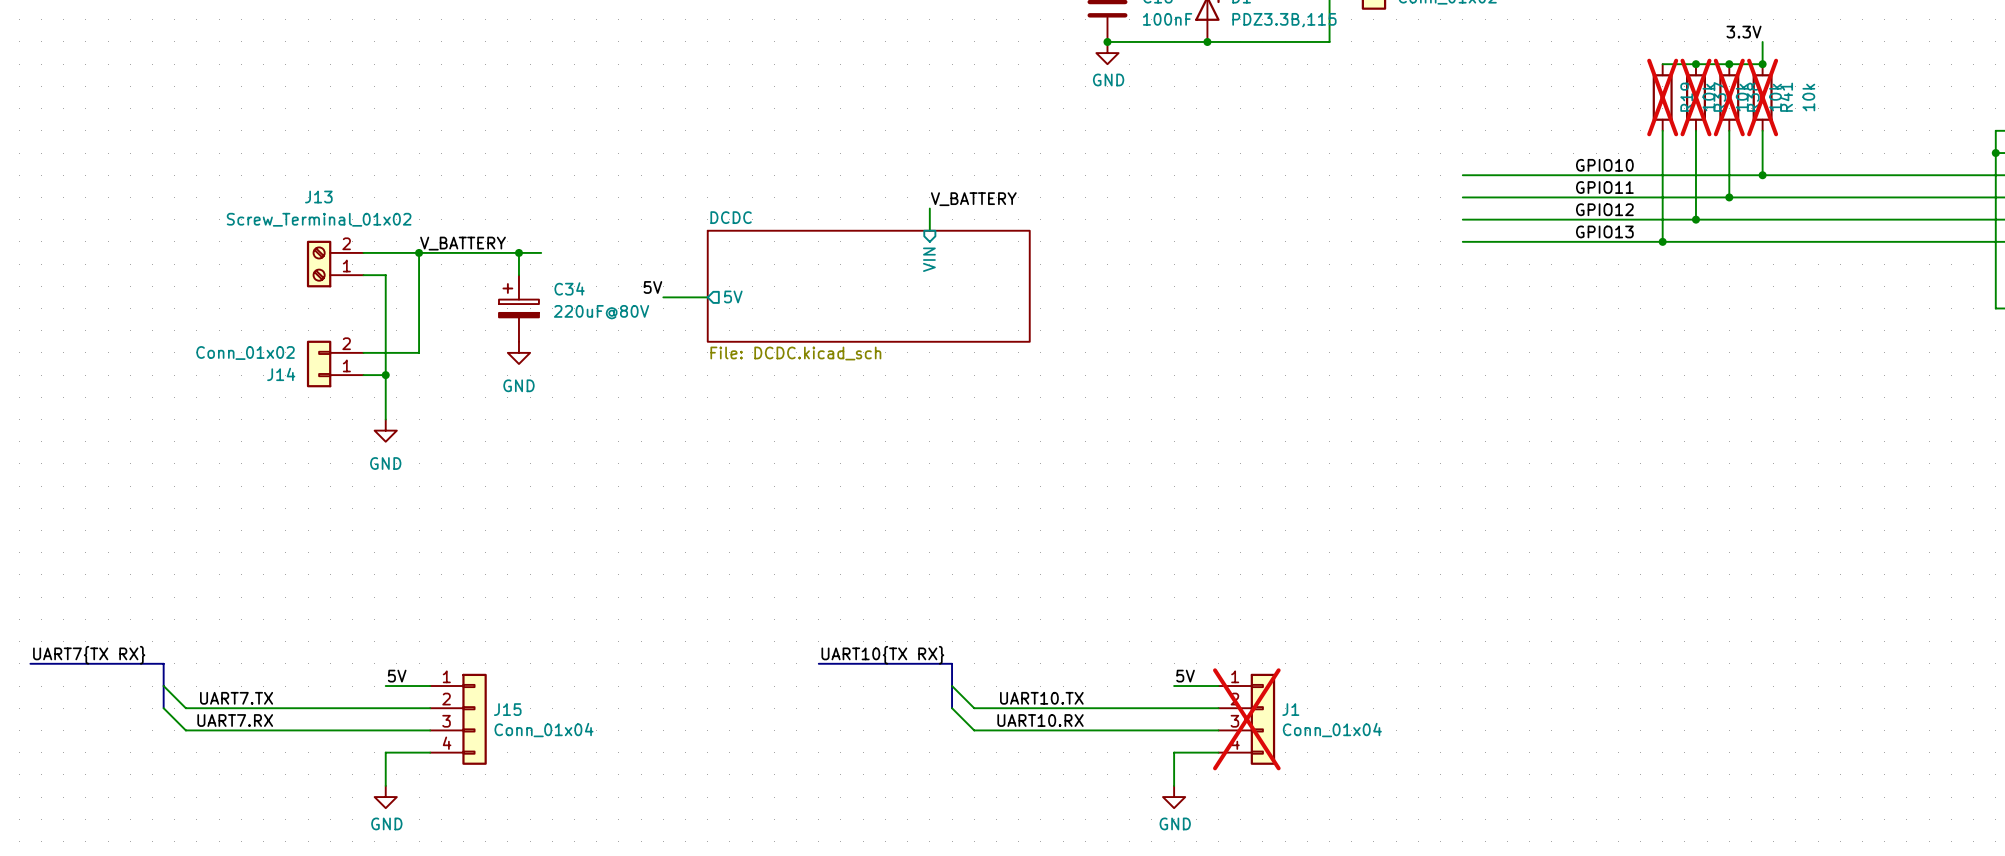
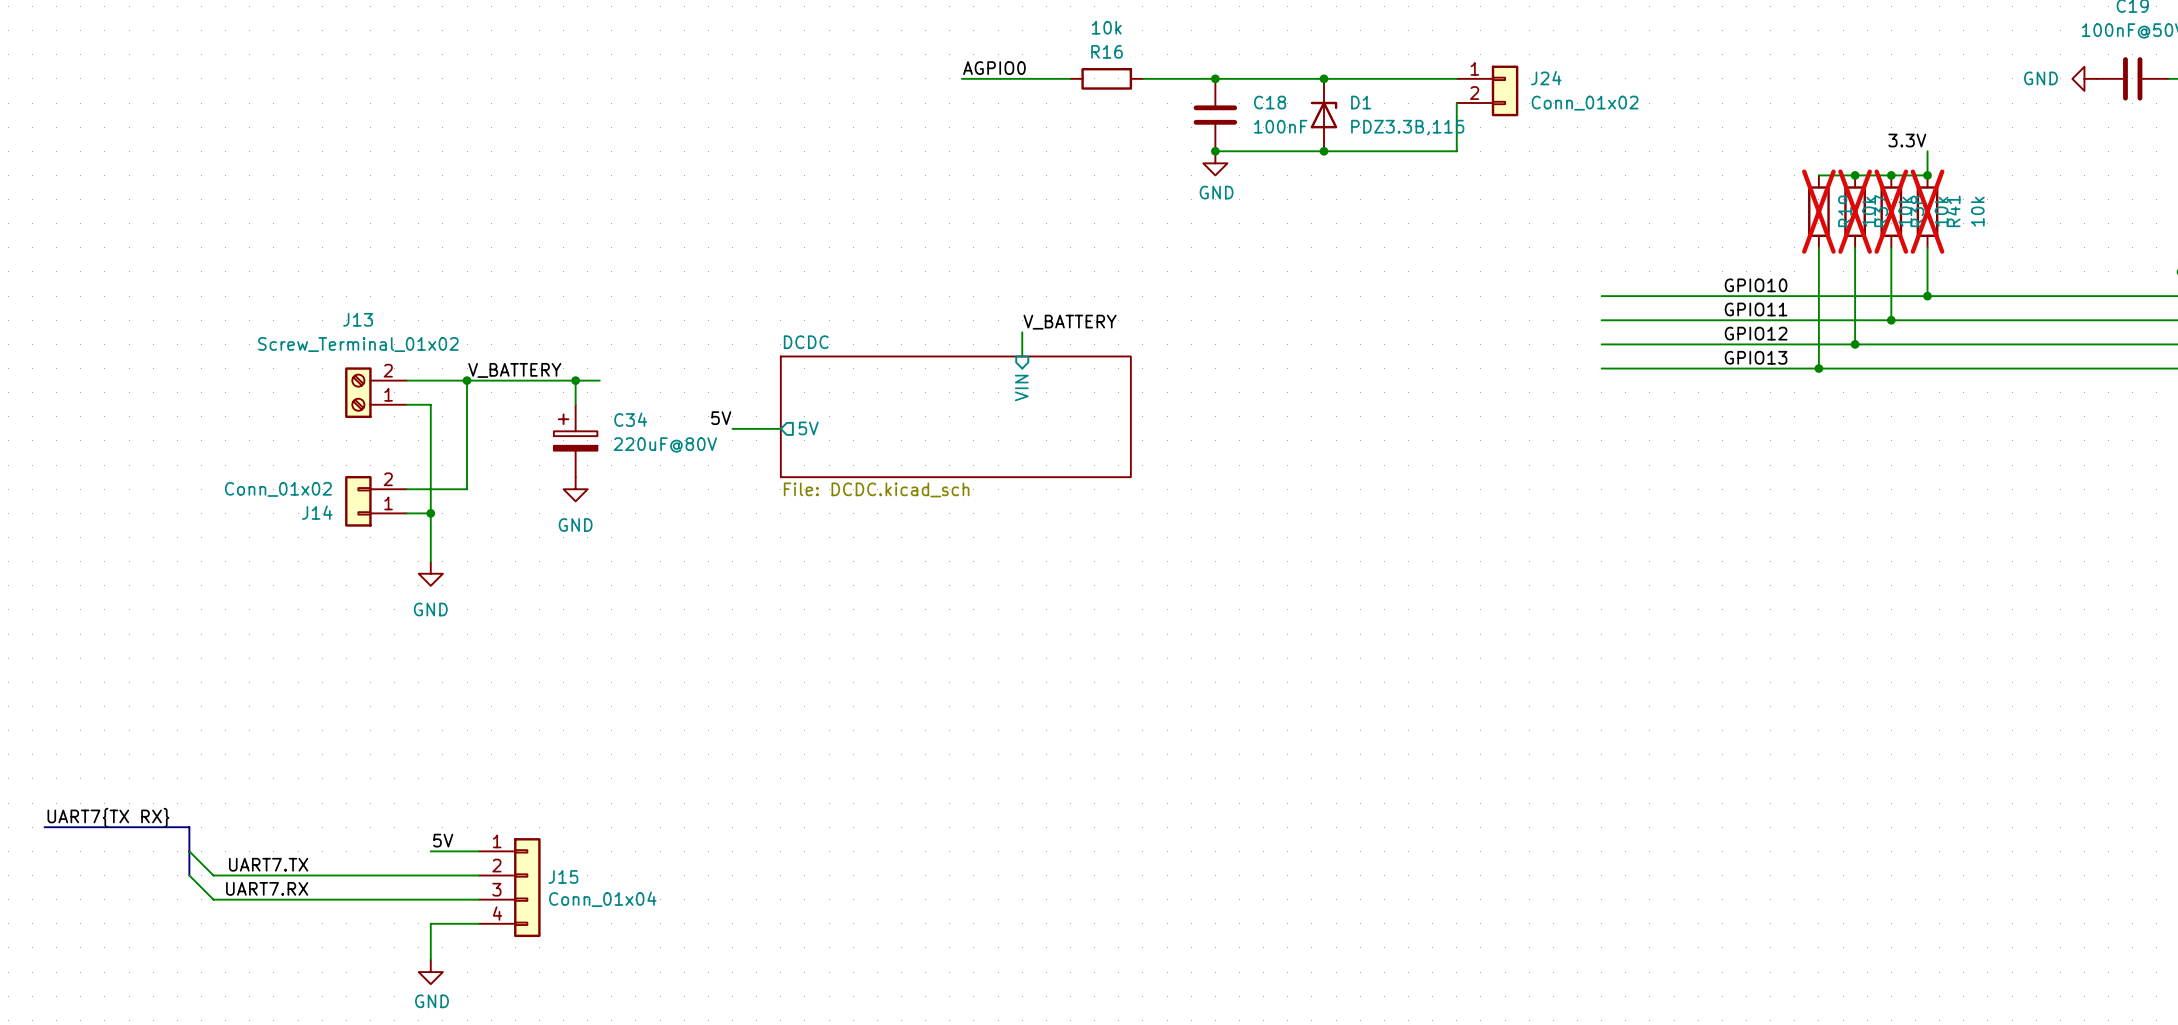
label: UART10{TX RX} (882, 655) -> none
bus: (818, 663) (952, 663) (952, 708) -> none
label: 5V (1185, 676) -> none
wire: (952, 686) (974, 708) (1218, 708) -> none
wire: (1174, 686) (1218, 686) -> none
label: UART10.TX (1041, 698) -> none
wire: (952, 708) (974, 730) (1218, 730) -> none
J1: Conn_01x04 (1246, 719) -> none
label: UART10.RX (1040, 720) -> none
wire: (1218, 752) (1174, 752) (1174, 785) -> none
power symbol: GND (1174, 797) -> none

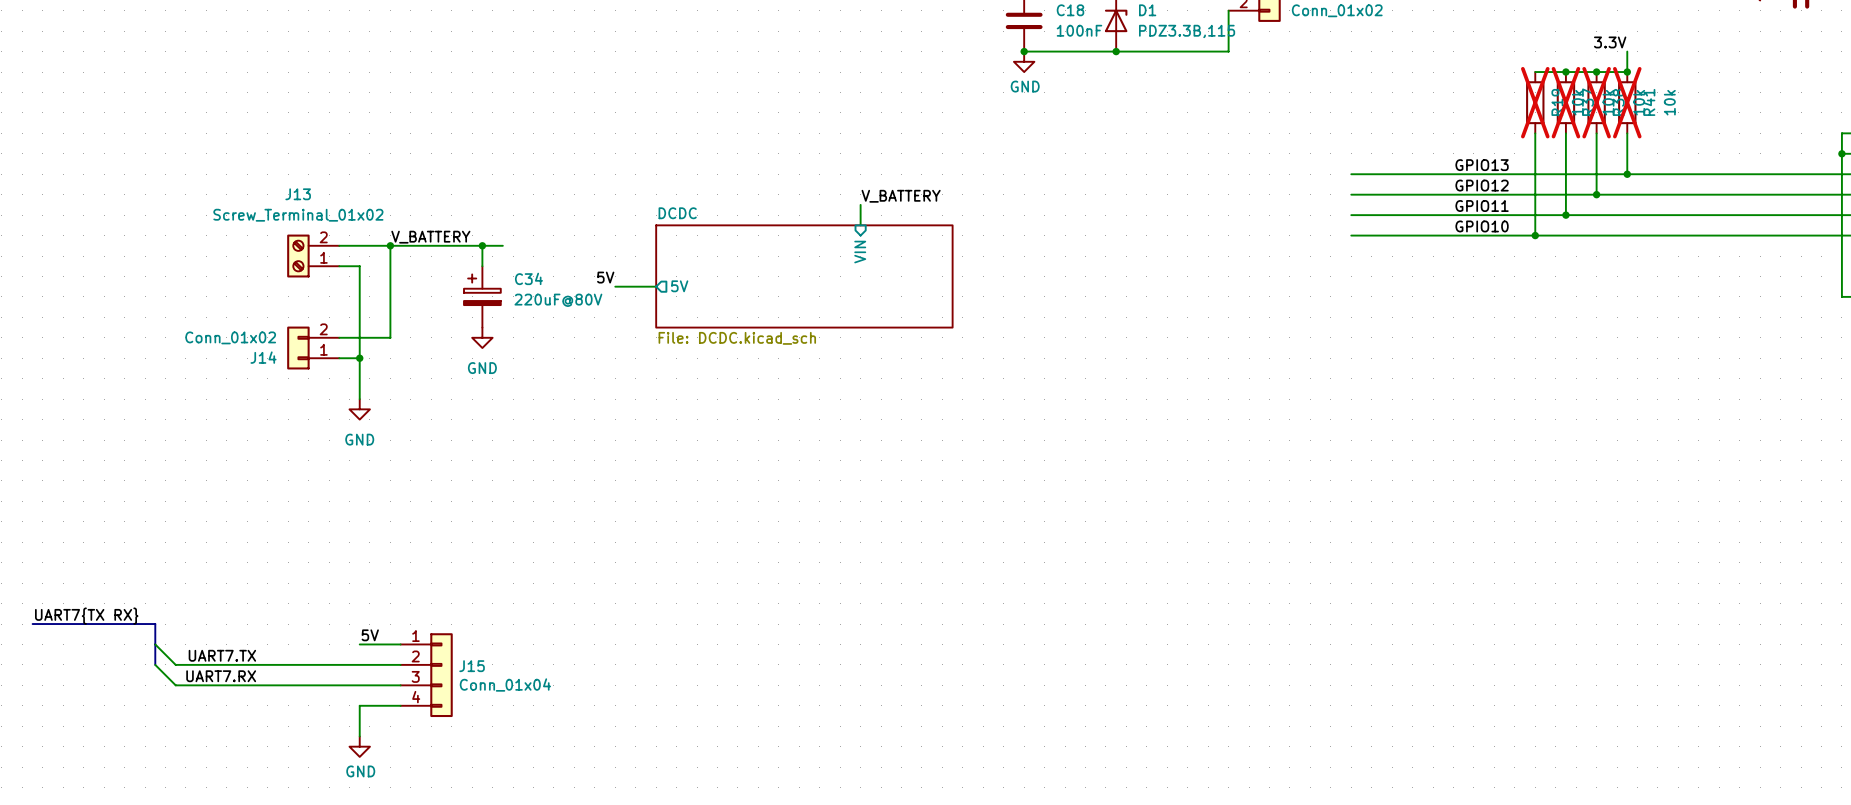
label: GPIO10 (1756, 285) -> GPIO13 (1482, 165)
label: GPIO11 (1756, 309) -> GPIO12 (1482, 185)
label: GPIO12 (1756, 333) -> GPIO11 (1482, 206)
label: GPIO13 (1756, 357) -> GPIO10 (1482, 226)

